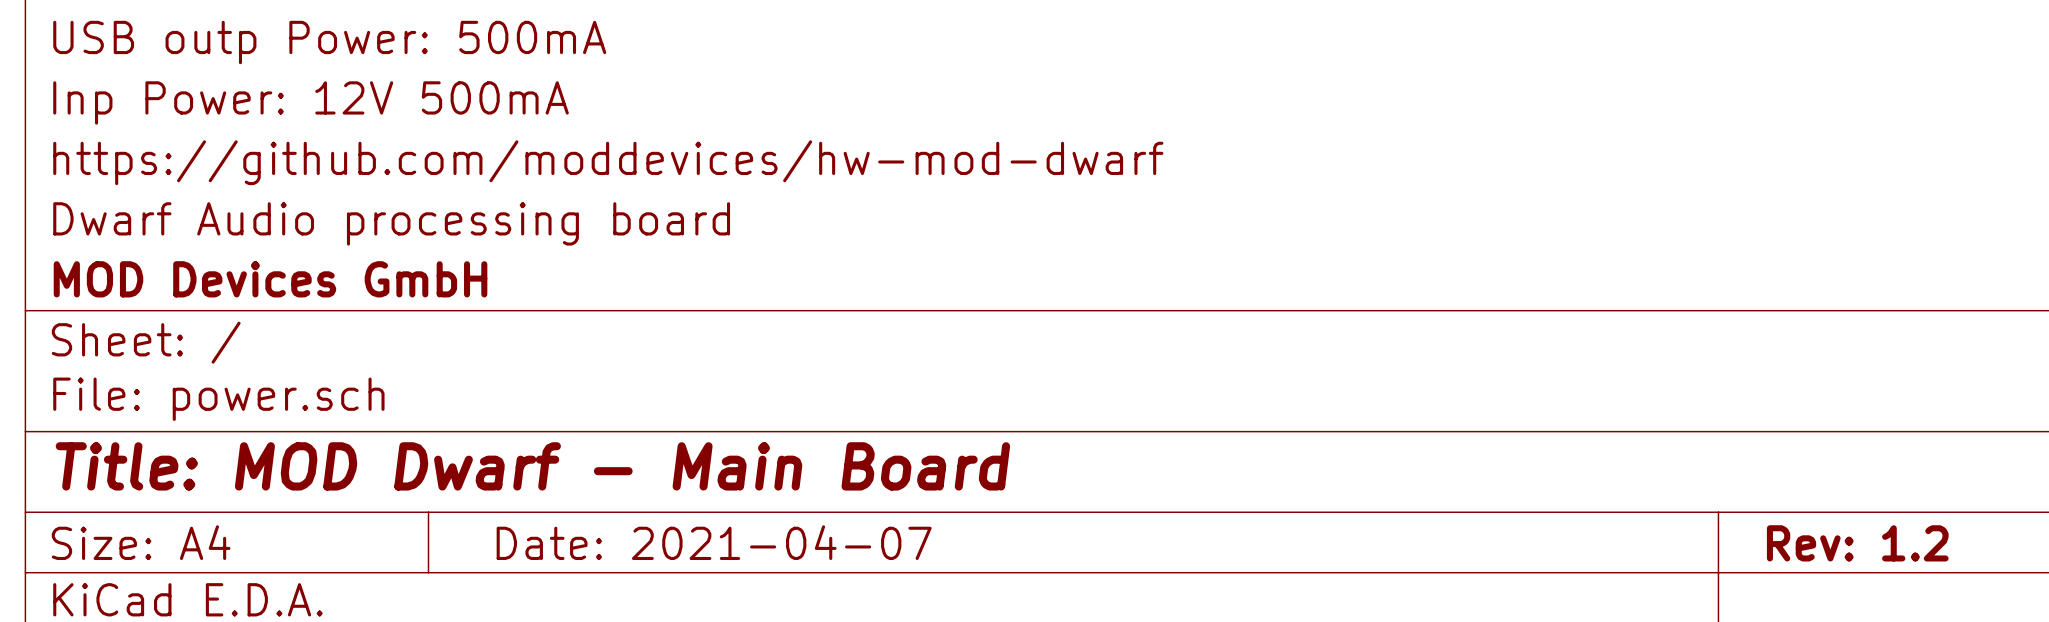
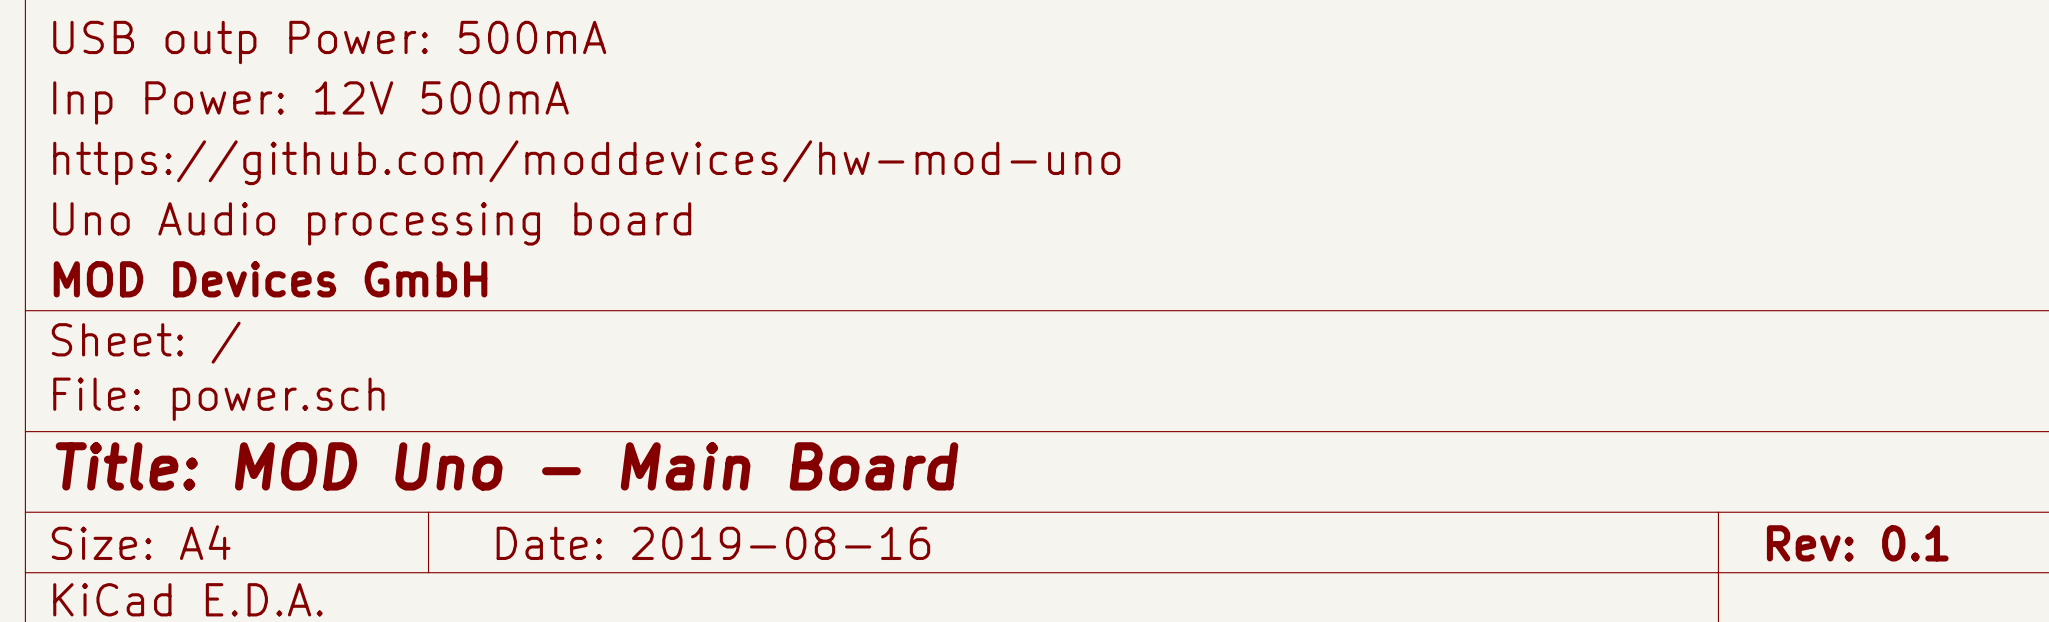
title block: https://github.com/moddevices/hw-mod-dwarf (608, 162) -> https://github.com/moddevices/hw-mod-uno (586, 162)
title block: Dwarf Audio processing board (391, 223) -> Uno Audio processing board (372, 223)
title block: Title: MOD Dwarf - Main Board (532, 466) -> Title: MOD Uno - Main Board (506, 466)
title block: Date: 2021-04-07 (714, 542) -> Date: 2019-08-16 (713, 543)
title block: Rev: 1.2 (1857, 543) -> Rev: 0.1 (1857, 543)

